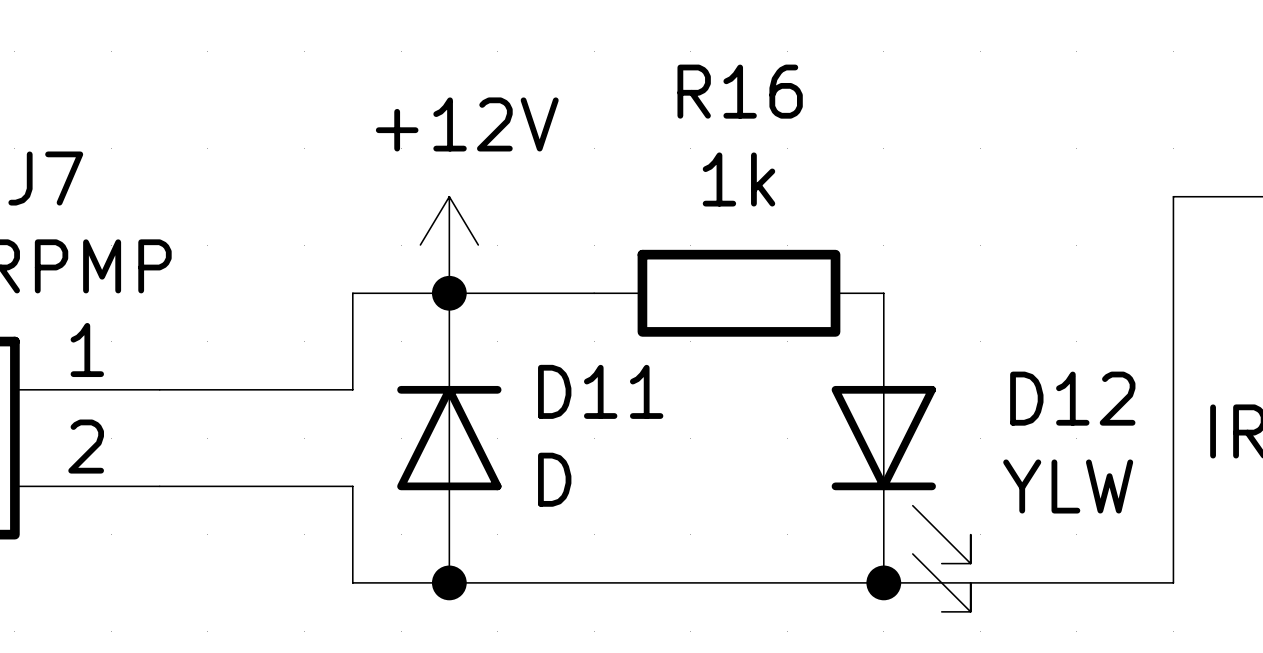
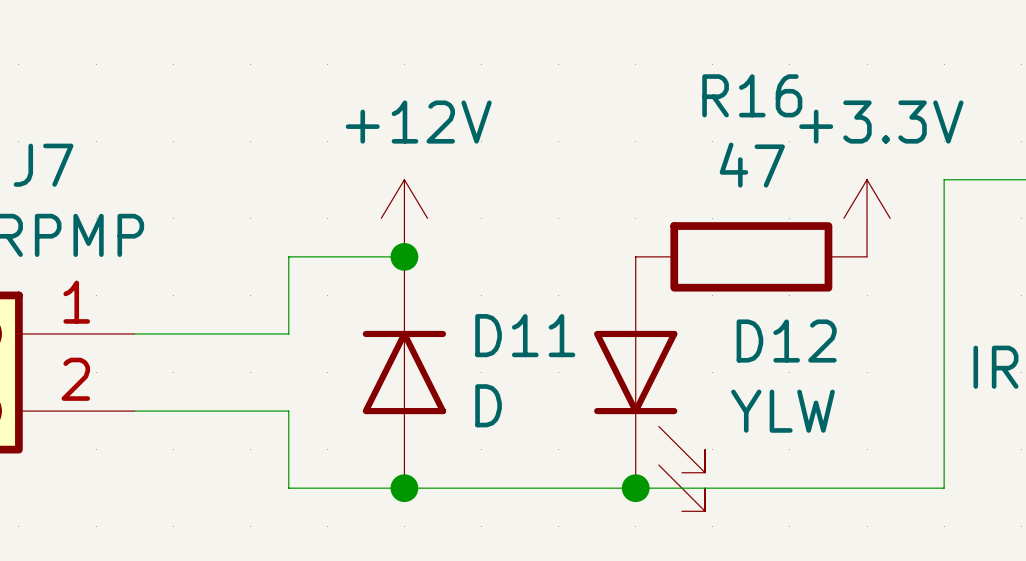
R16 value: 1k (738, 179) -> 47 (752, 165)
power symbol position: +12V (449, 245) -> +12V (404, 218)
power symbol: none -> +3.3V (867, 218)
junction position: (449, 293) -> (404, 256)
wire: (497, 293) (594, 293) -> none
R16 position: (738, 293) -> (751, 256)
D11 position: (449, 438) -> (404, 372)
D12 position: (901, 452) -> (649, 384)
junction position: (449, 582) -> (404, 488)
junction position: (883, 582) -> (635, 488)

